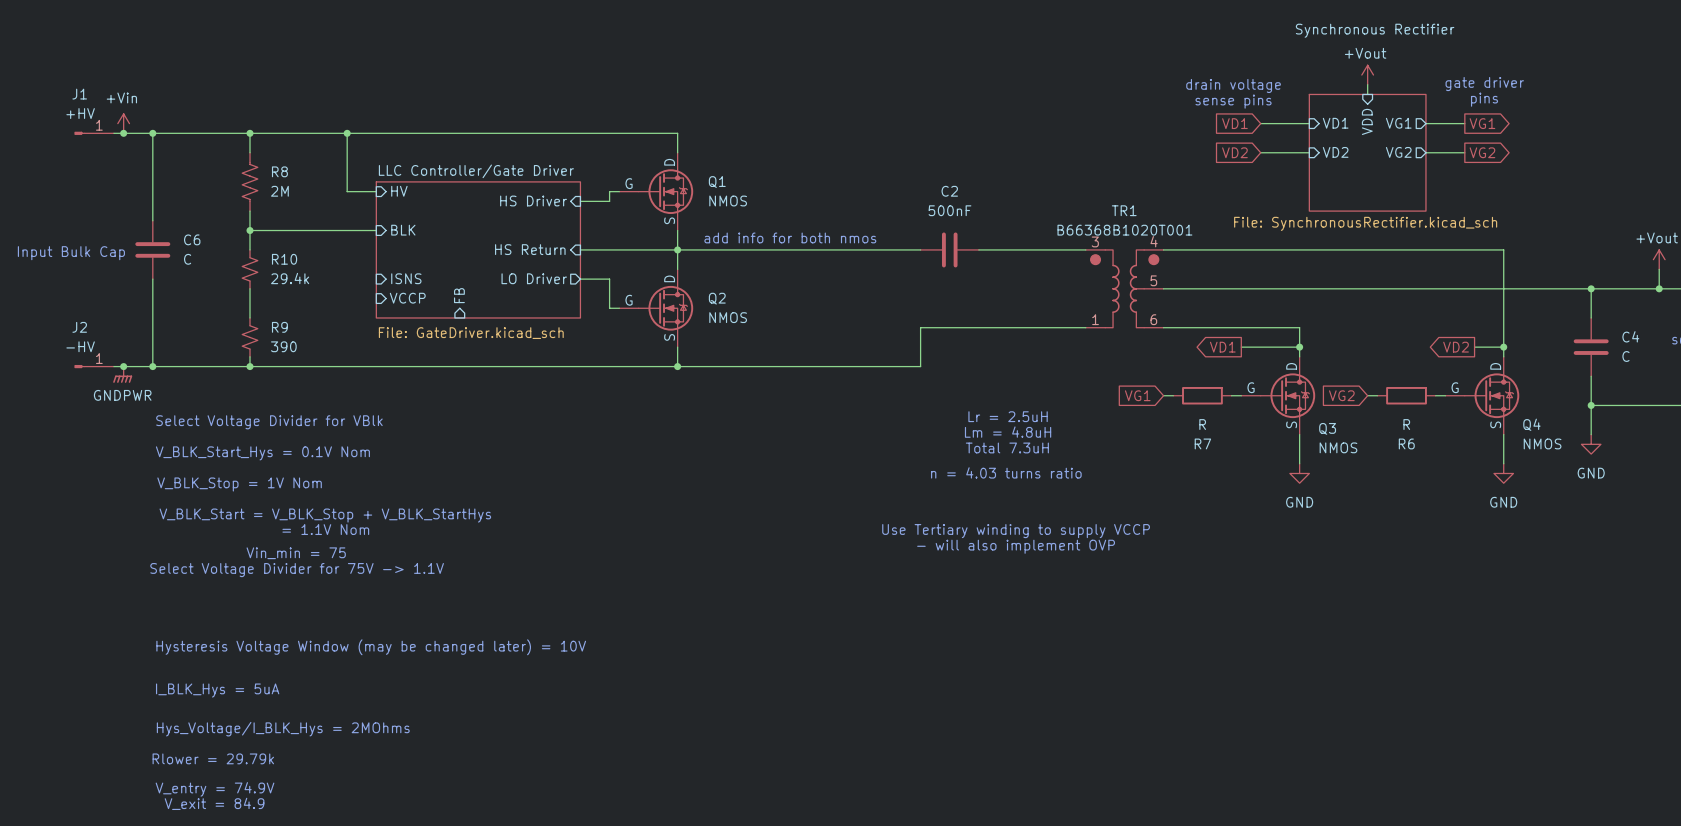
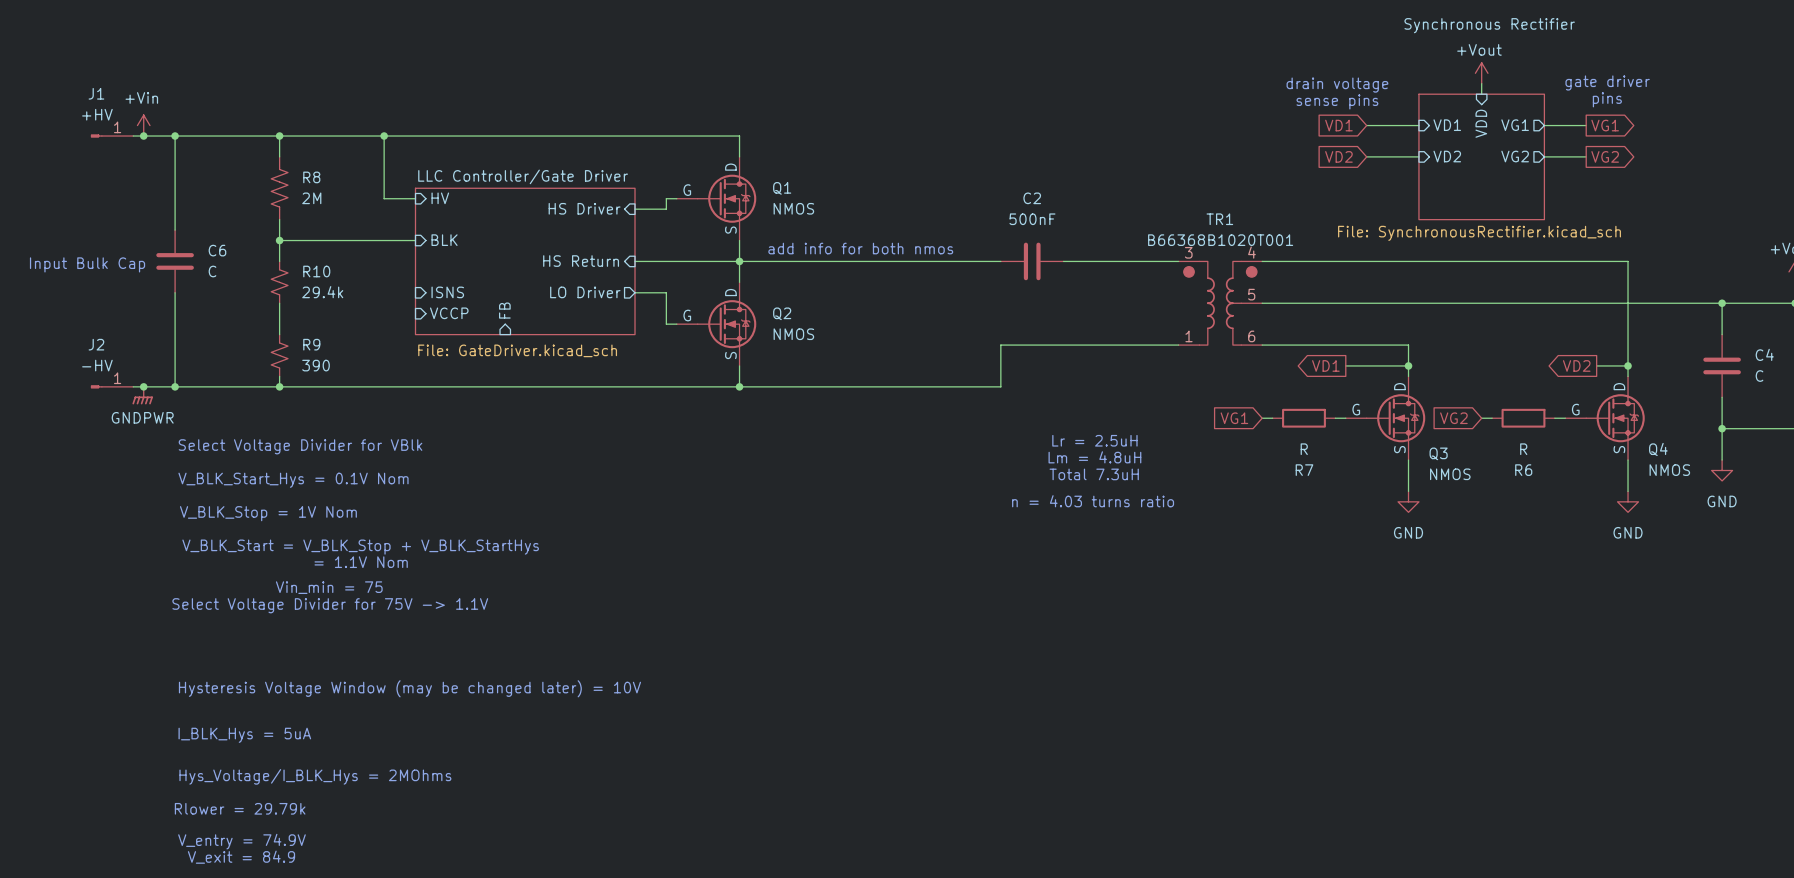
text: Use Tertiary winding to supply VCCP (1016, 531) -> none
text: - will also implement OVP (1016, 546) -> none

